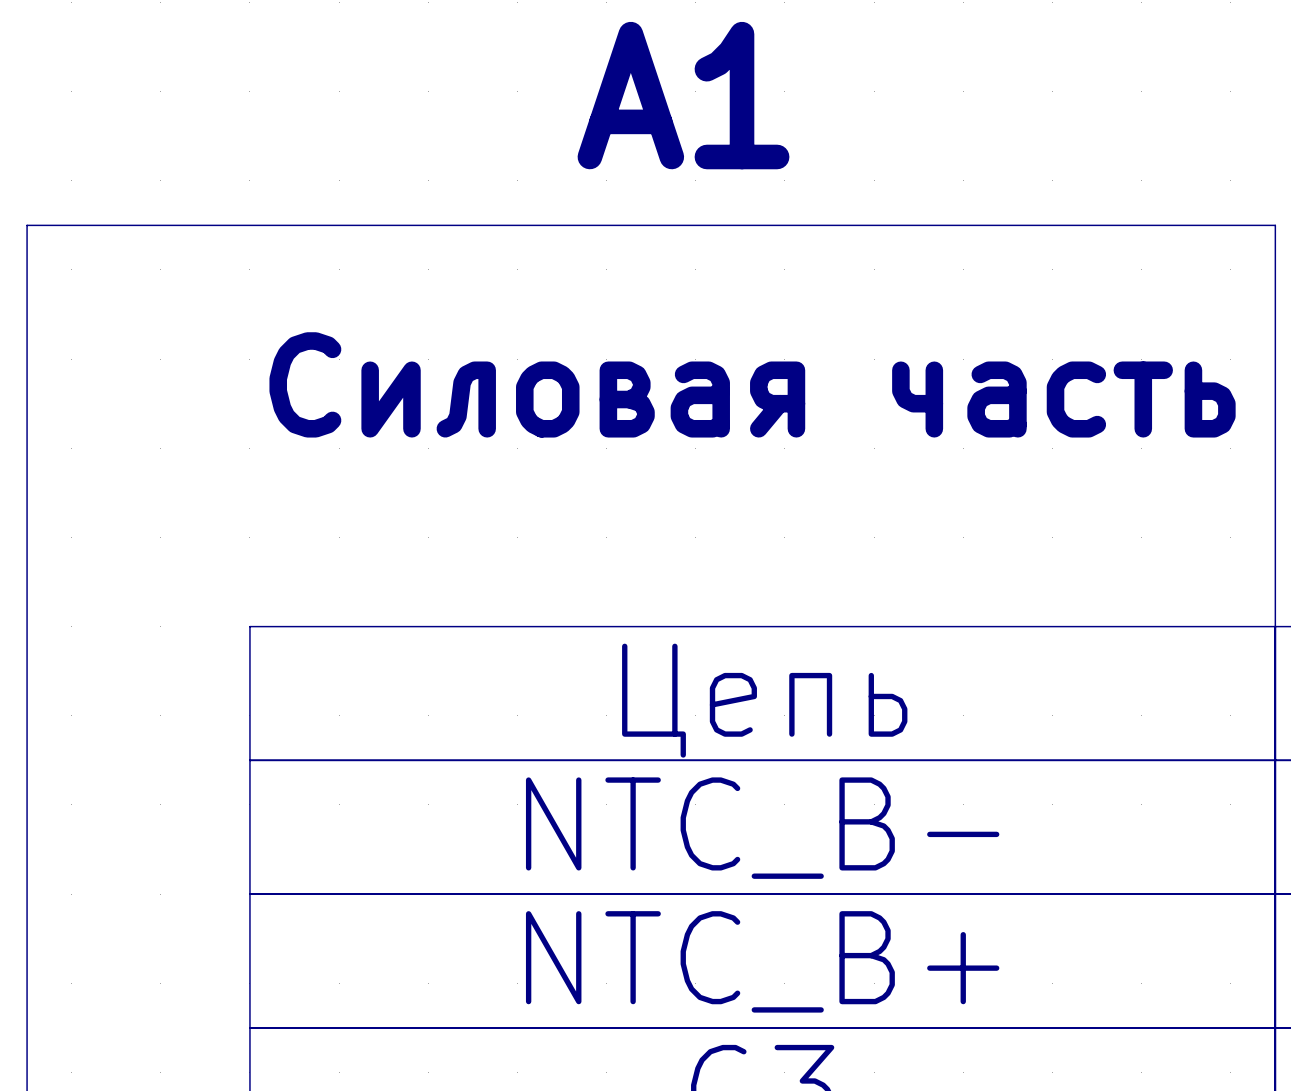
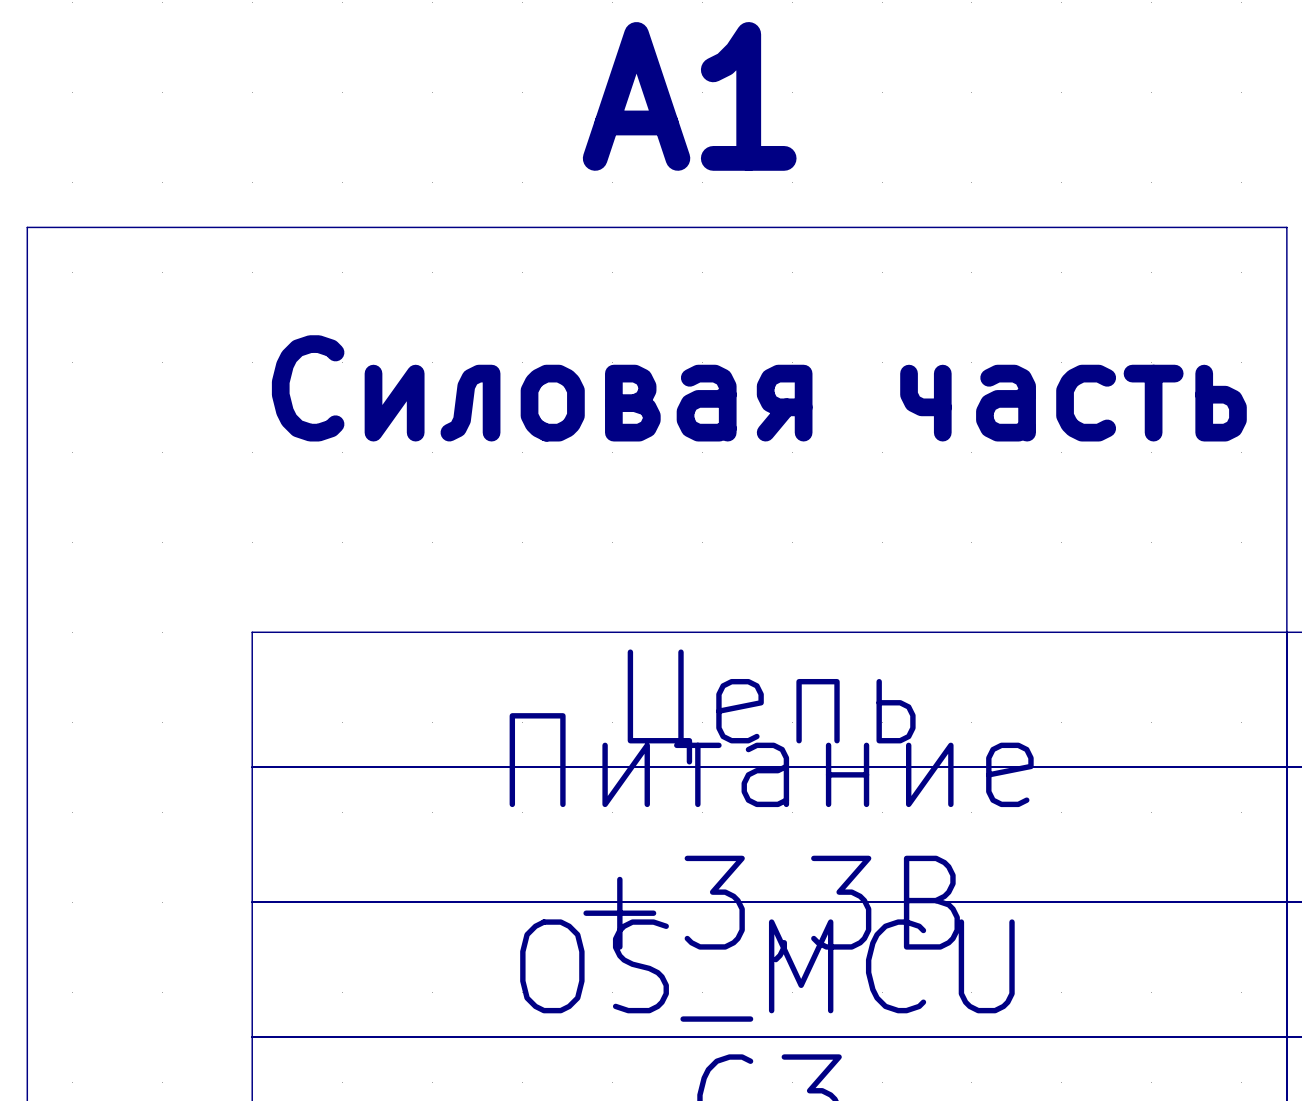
text: none -> Питание (771, 760)
text: NTC_B- (762, 828) -> none
text: none -> +3,3В (771, 909)
text: NTC_B+ (762, 961) -> OS_MCU (767, 970)

